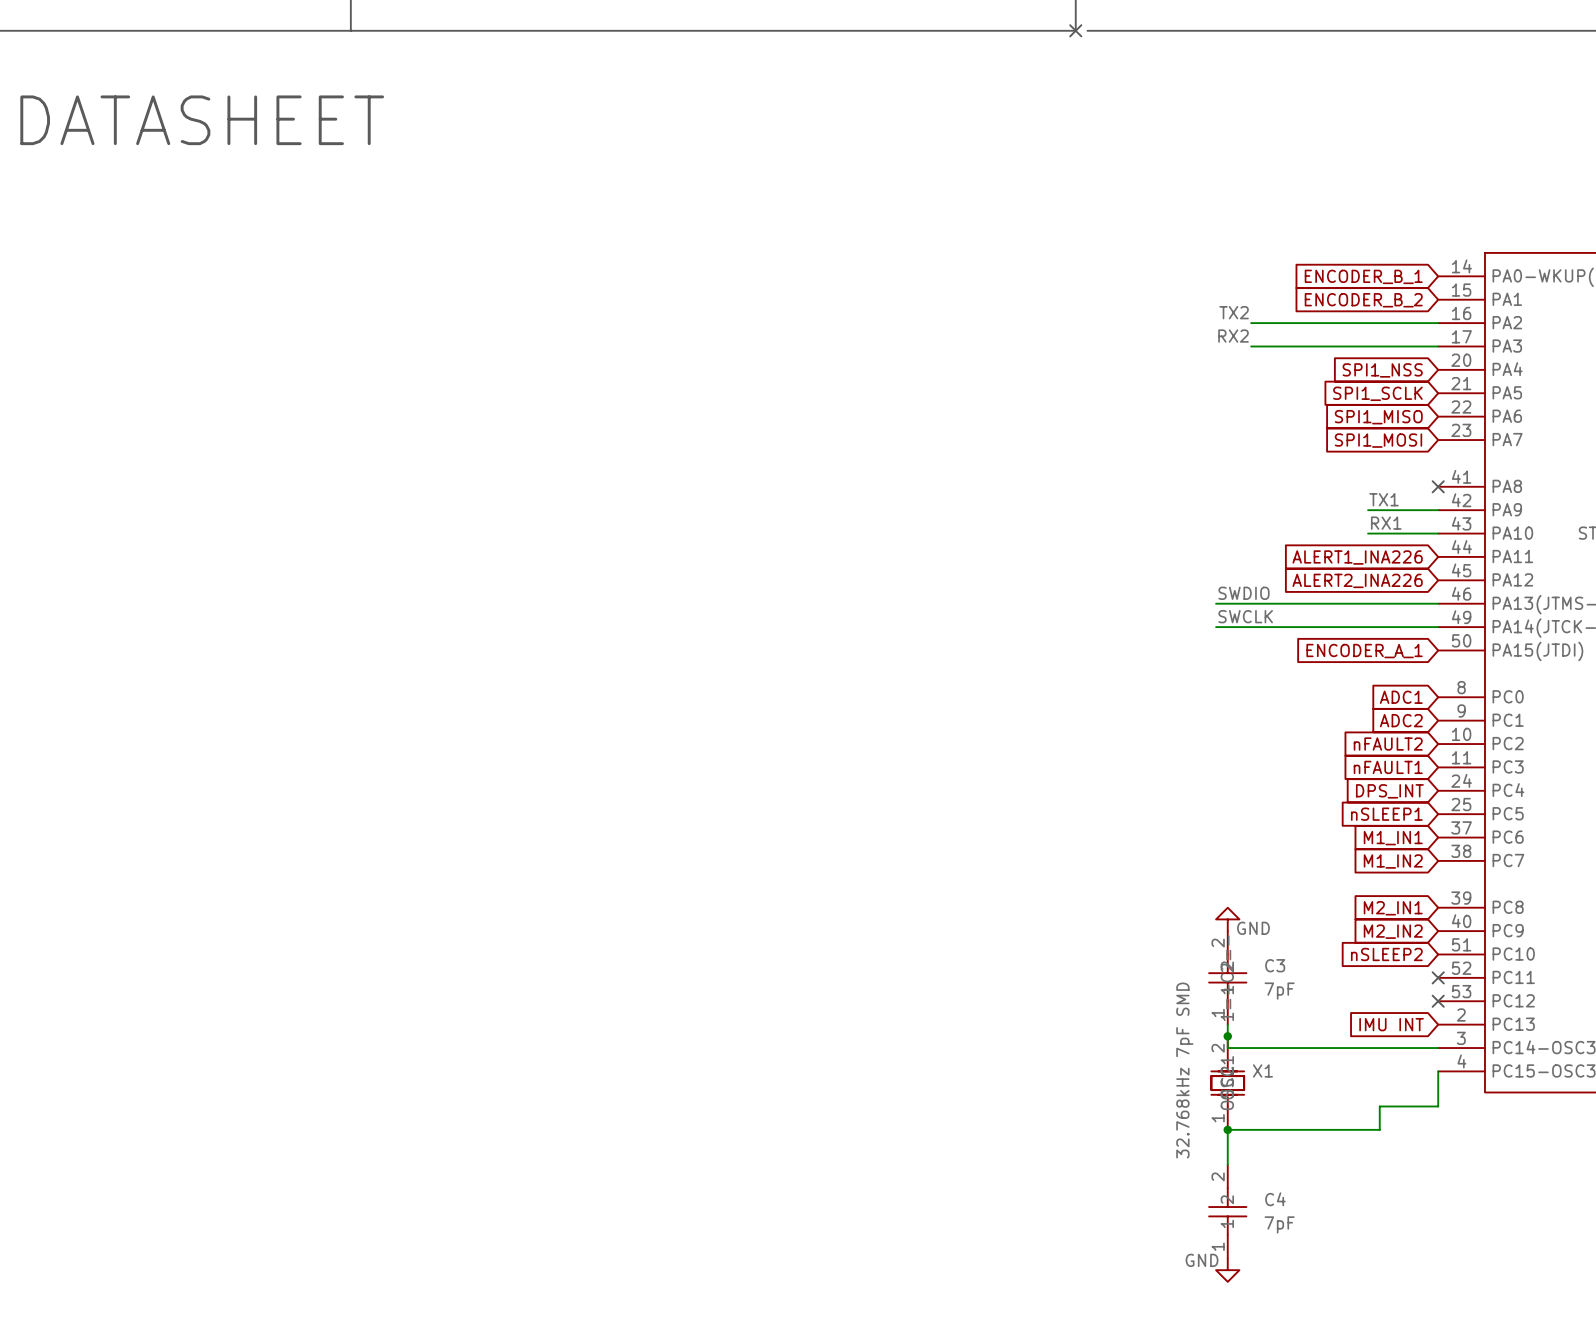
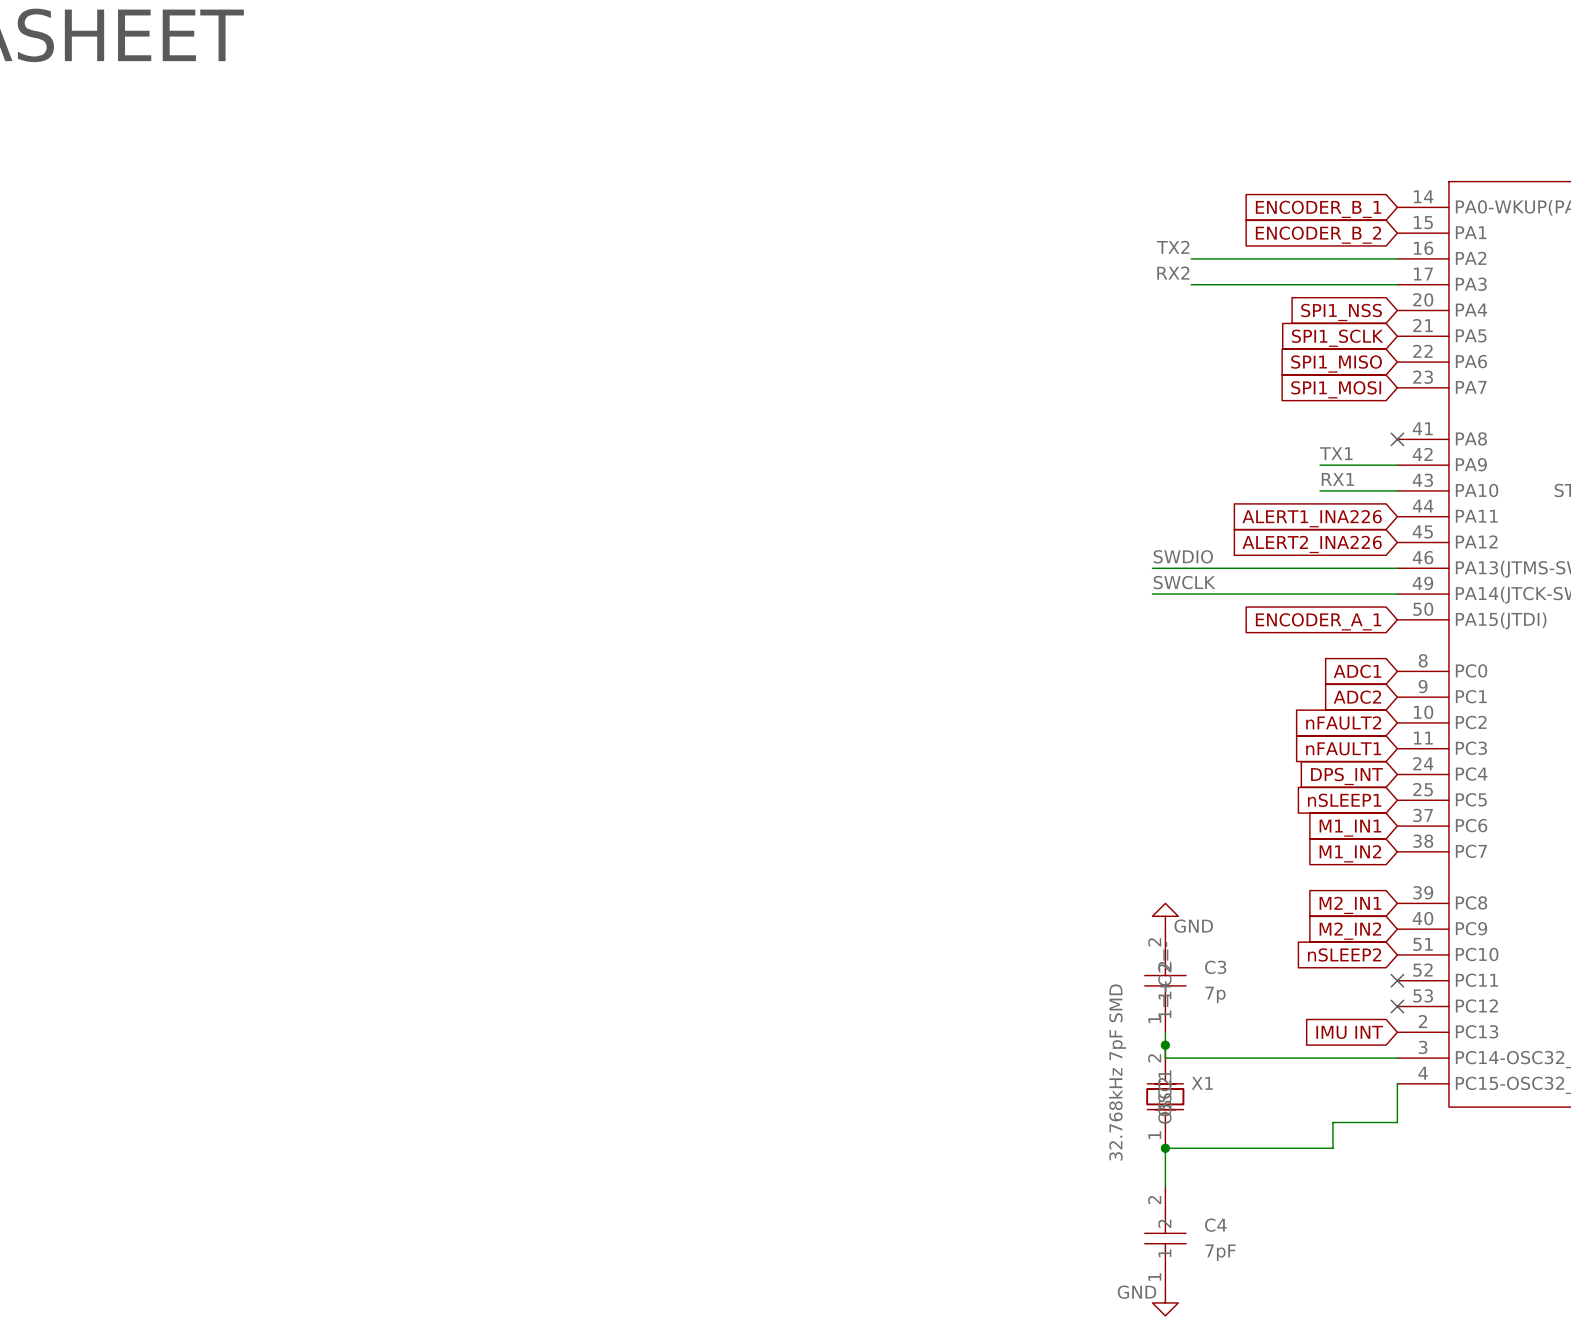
C3 value: 7pF (1279, 991) -> 7p (1215, 994)

